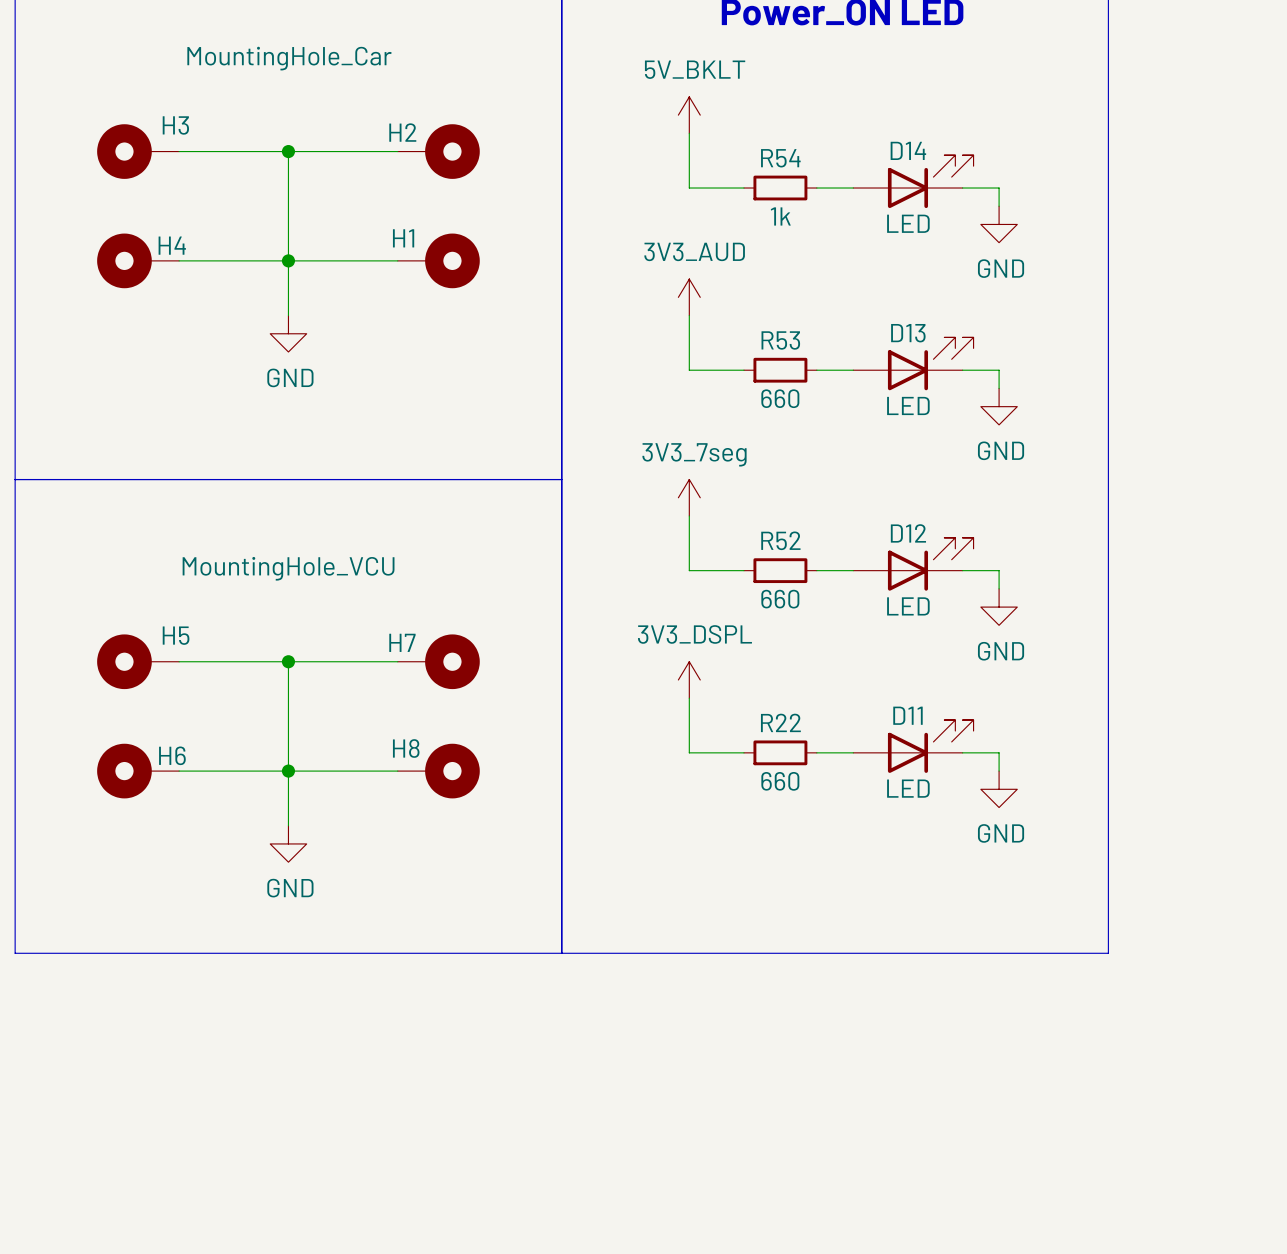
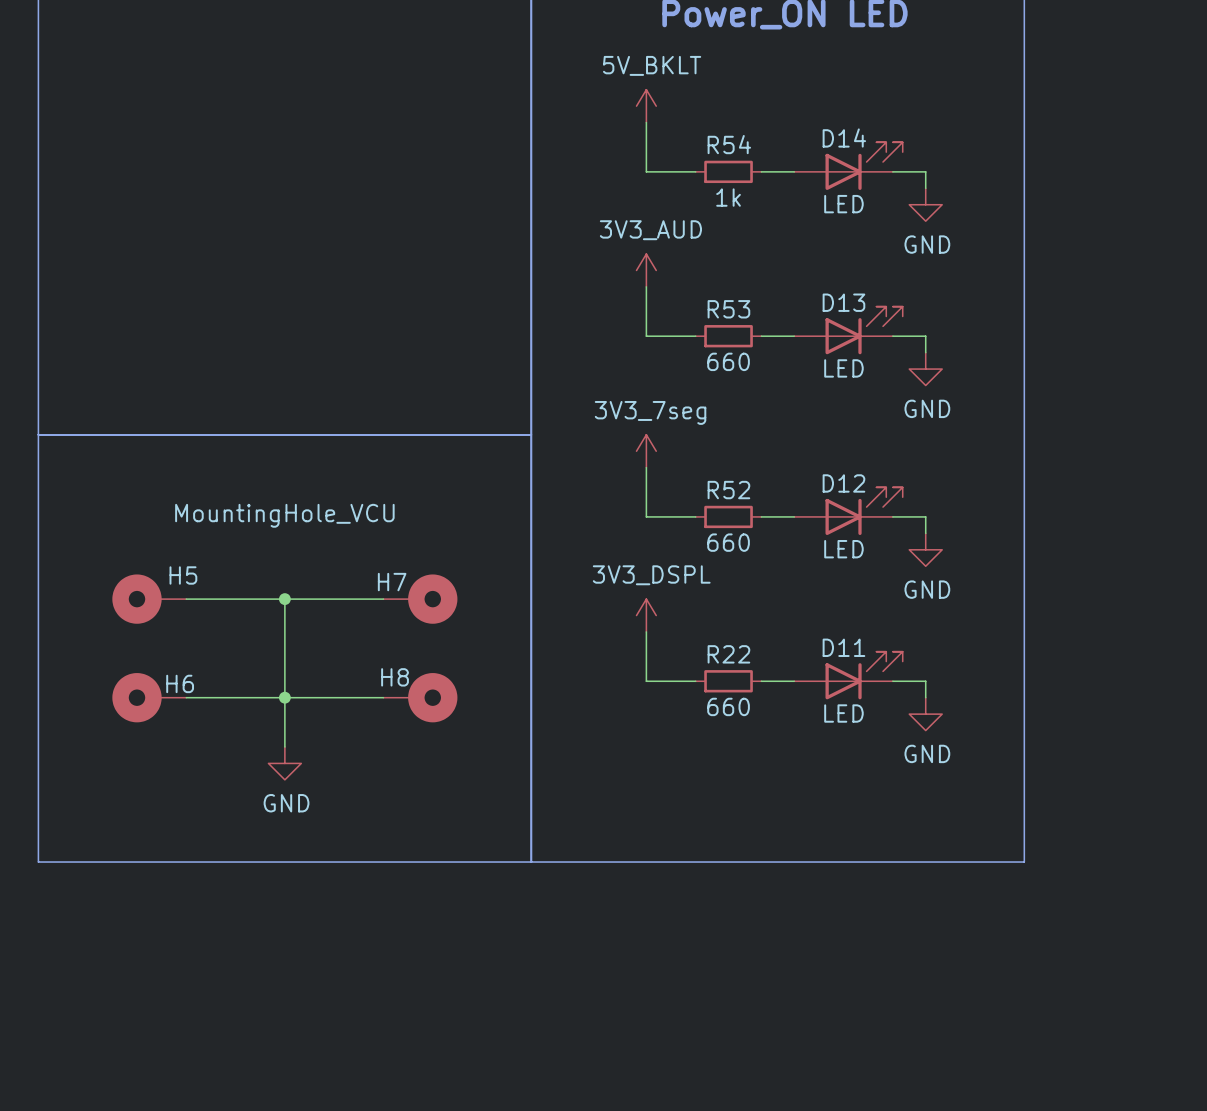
H3: MountingHole_Car (138, 151) -> none
wire: (179, 151) (397, 151) -> none
wire: (288, 151) (288, 315) -> none
junction: (288, 151) -> none
H2: (438, 151) -> none
H4: (138, 260) -> none
wire: (179, 260) (397, 260) -> none
junction: (288, 260) -> none
H1: (438, 260) -> none
power symbol: GND (288, 333) -> none

